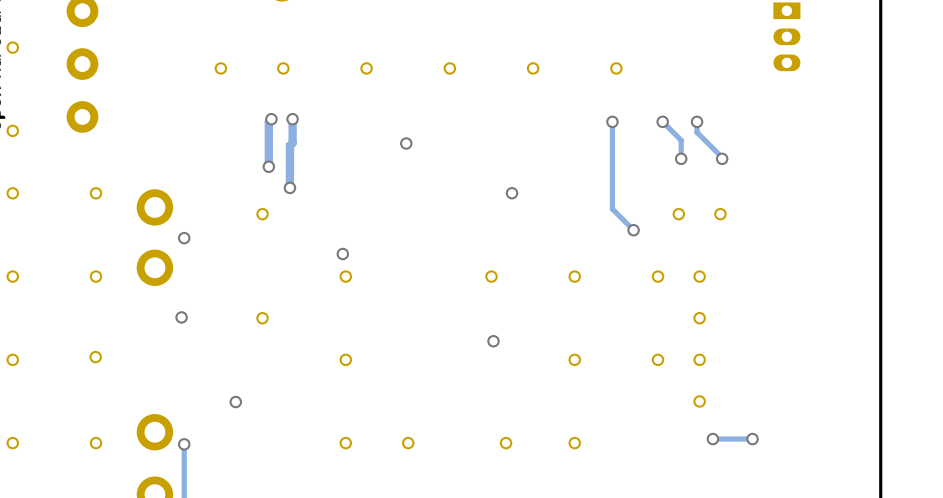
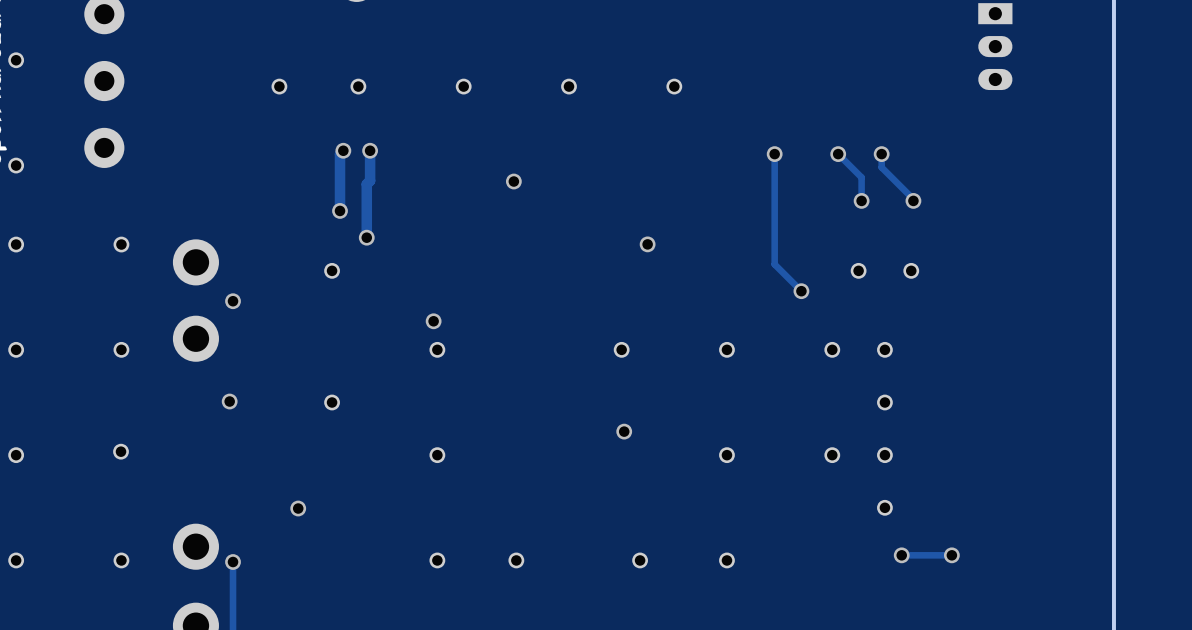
part: (616, 68) -> none

